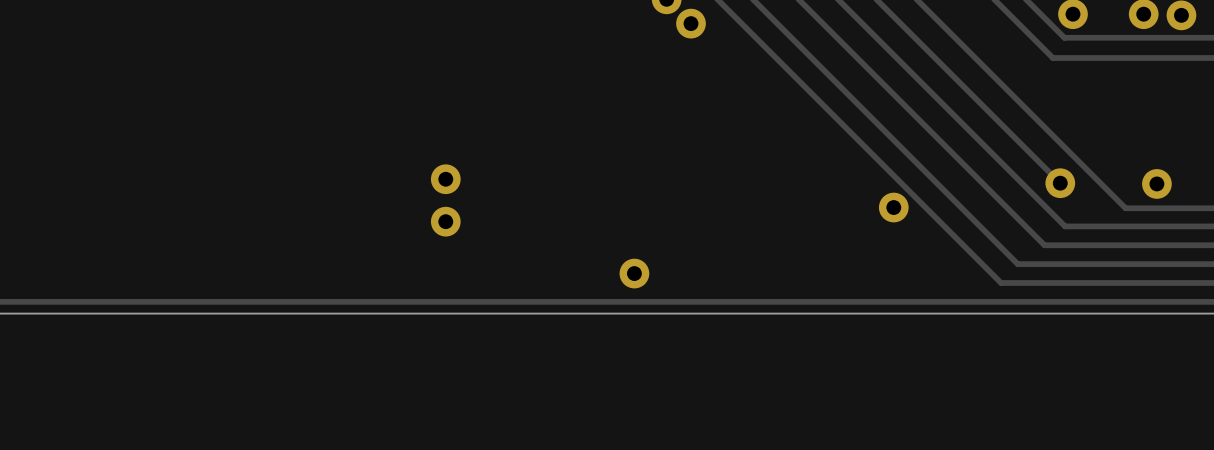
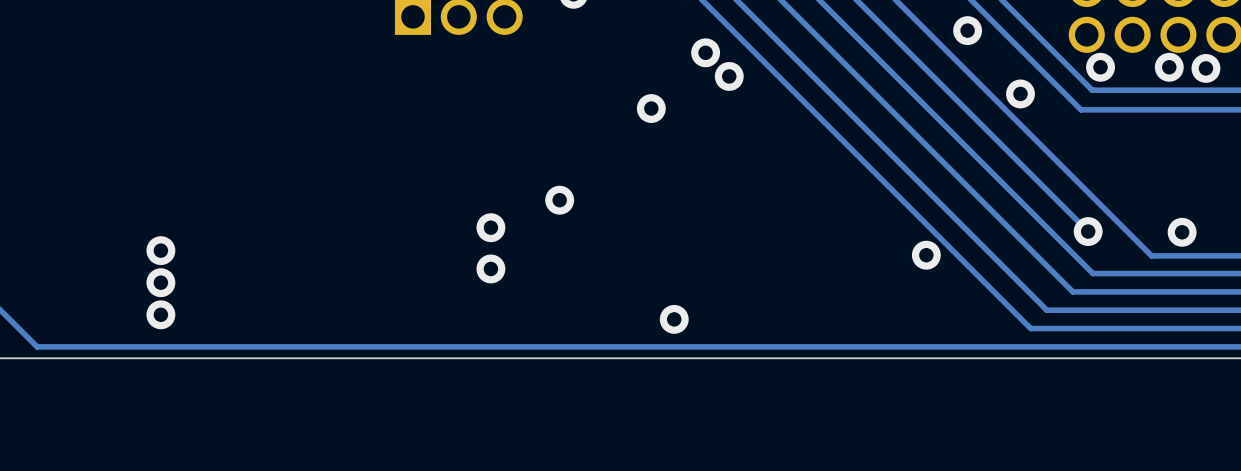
via: none -> (1020, 93)
via: none -> (651, 108)
via: none -> (559, 200)
via: none -> (160, 250)
via: none -> (160, 282)
via: none -> (160, 314)

